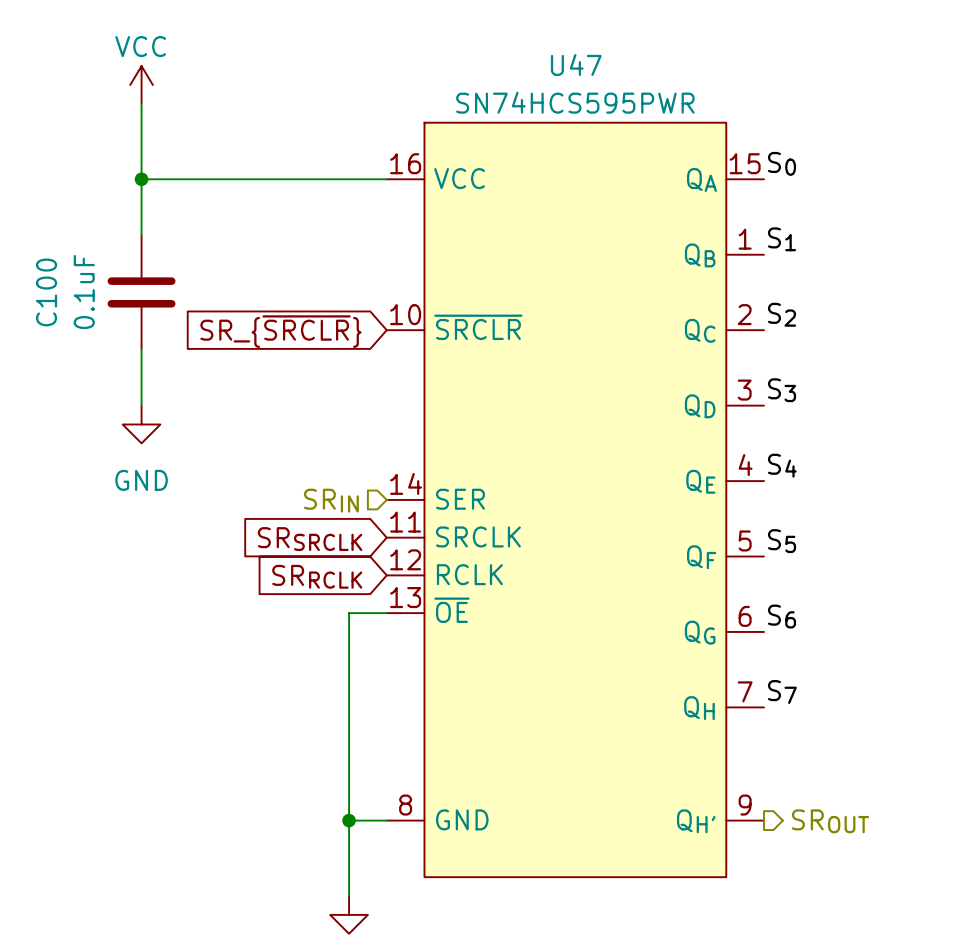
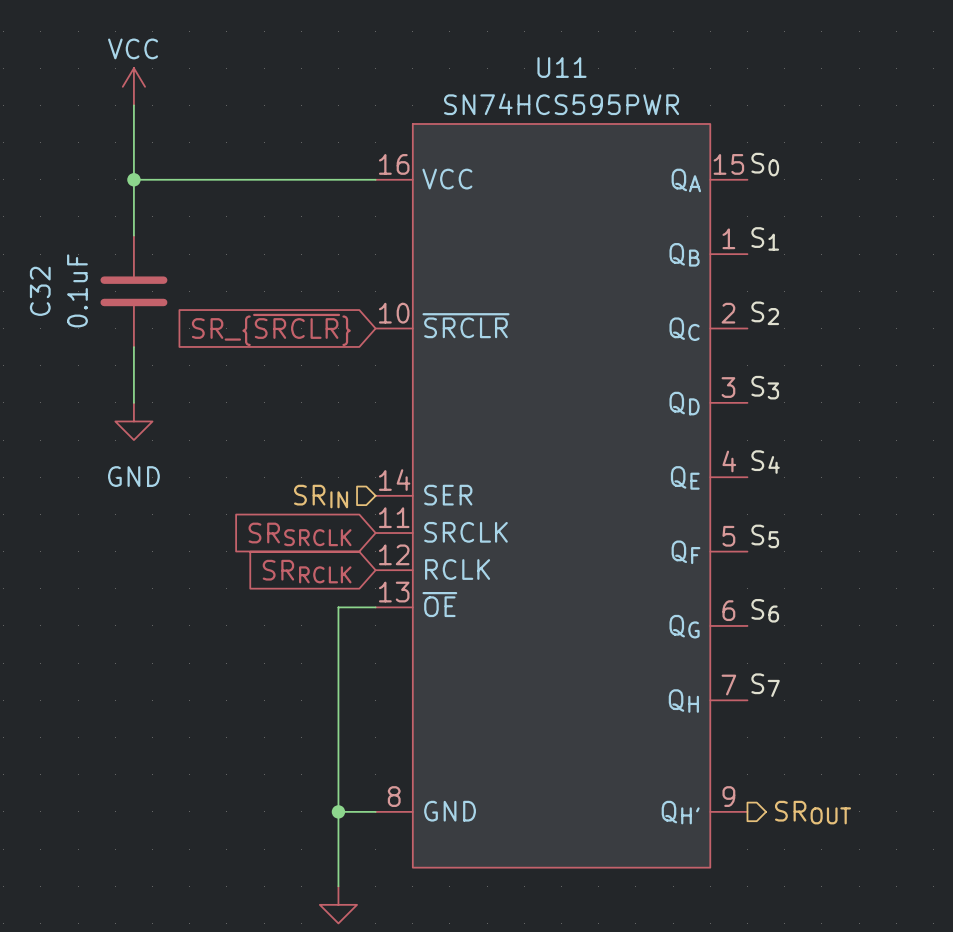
U47 name: U47 (576, 64) -> U11 (561, 67)
C100 name: C100 (46, 292) -> C32 (40, 291)

